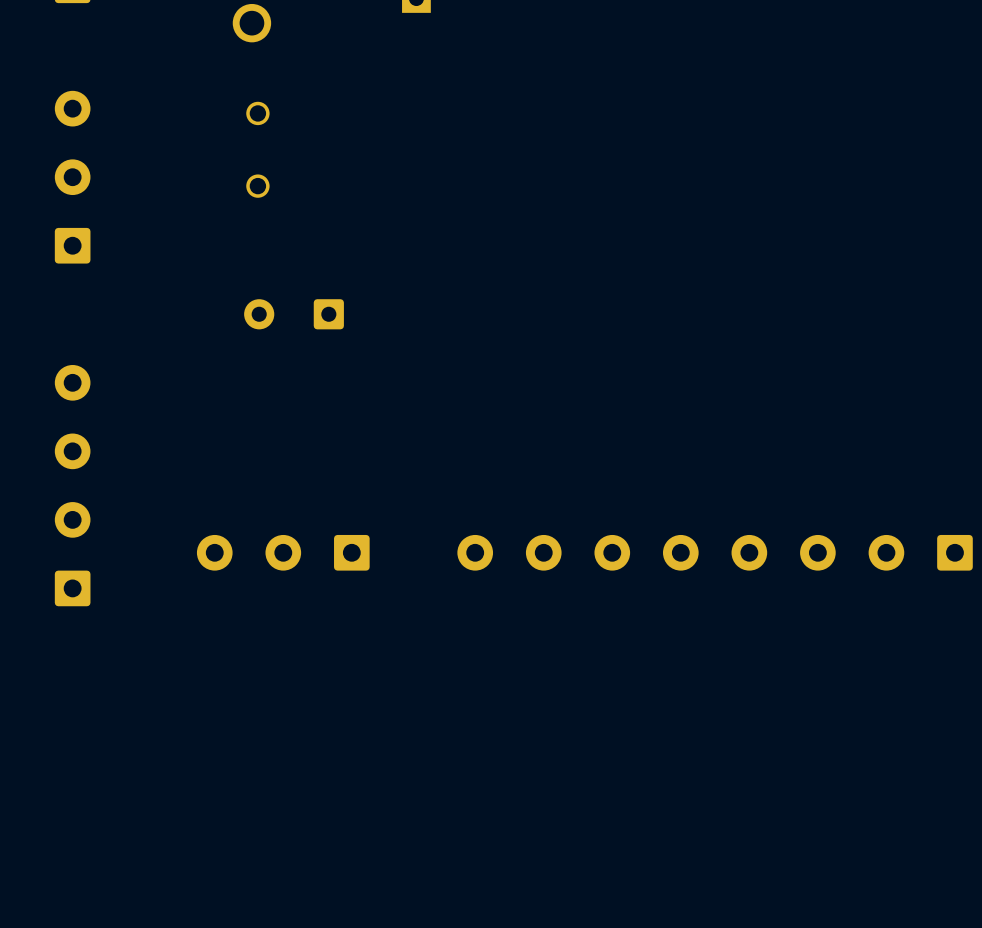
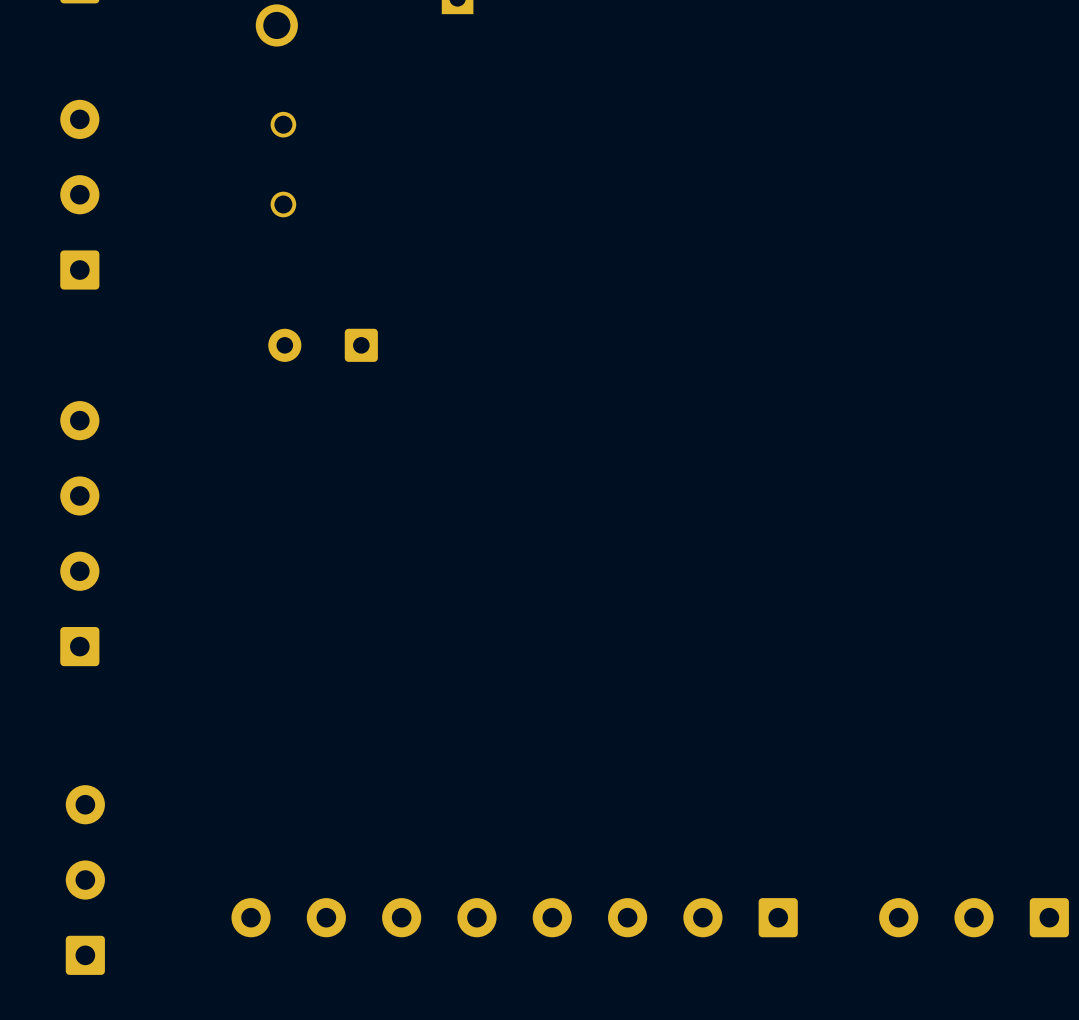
part rotation: 0° (283, 552) -> 90° clockwise (85, 880)
part position: (283, 552) -> (85, 880)
part: (715, 552) -> none
part: none -> (514, 917)
part: none -> (974, 917)

